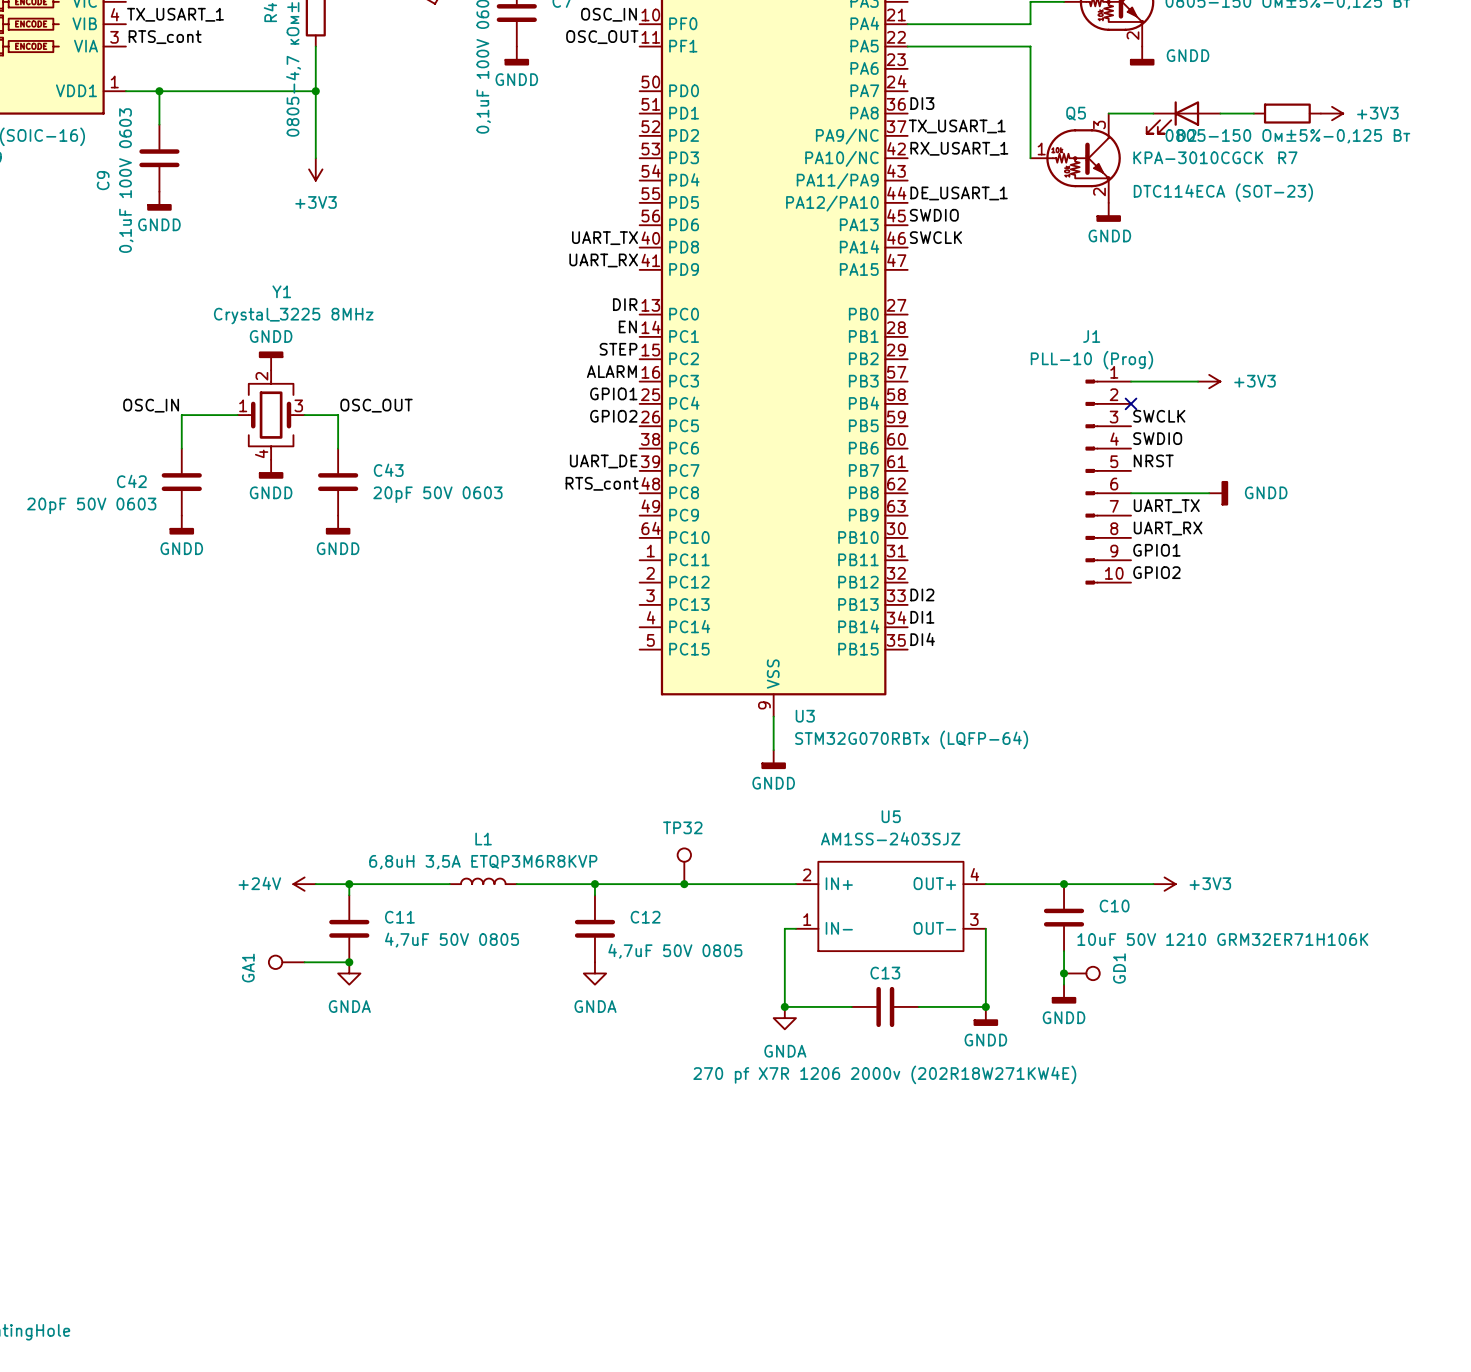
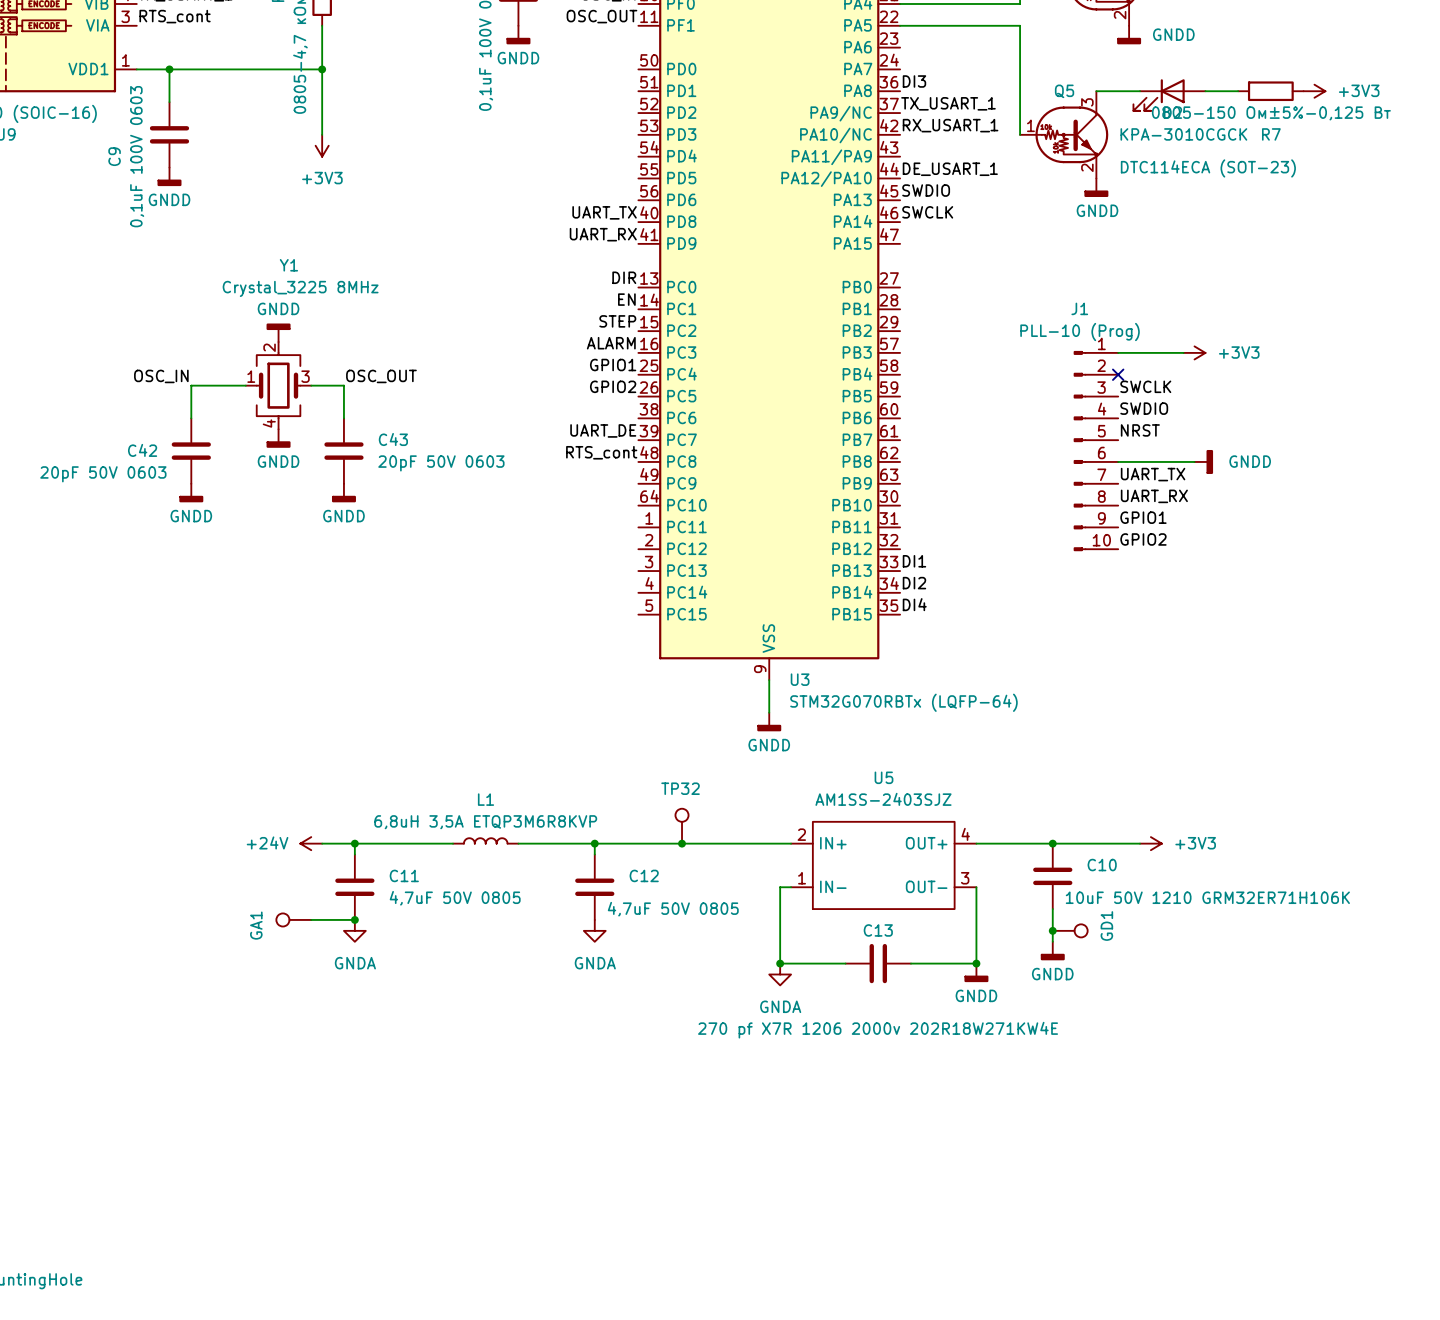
label: DI2 (922, 594) -> DI1 (914, 561)
label: DI1 (922, 617) -> DI2 (914, 583)
C13 value: 270 pf X7R 1206 2000v (202R18W271KW4E) (884, 1074) -> 270 pf X7R 1206 2000v 202R18W271KW4E (878, 1030)

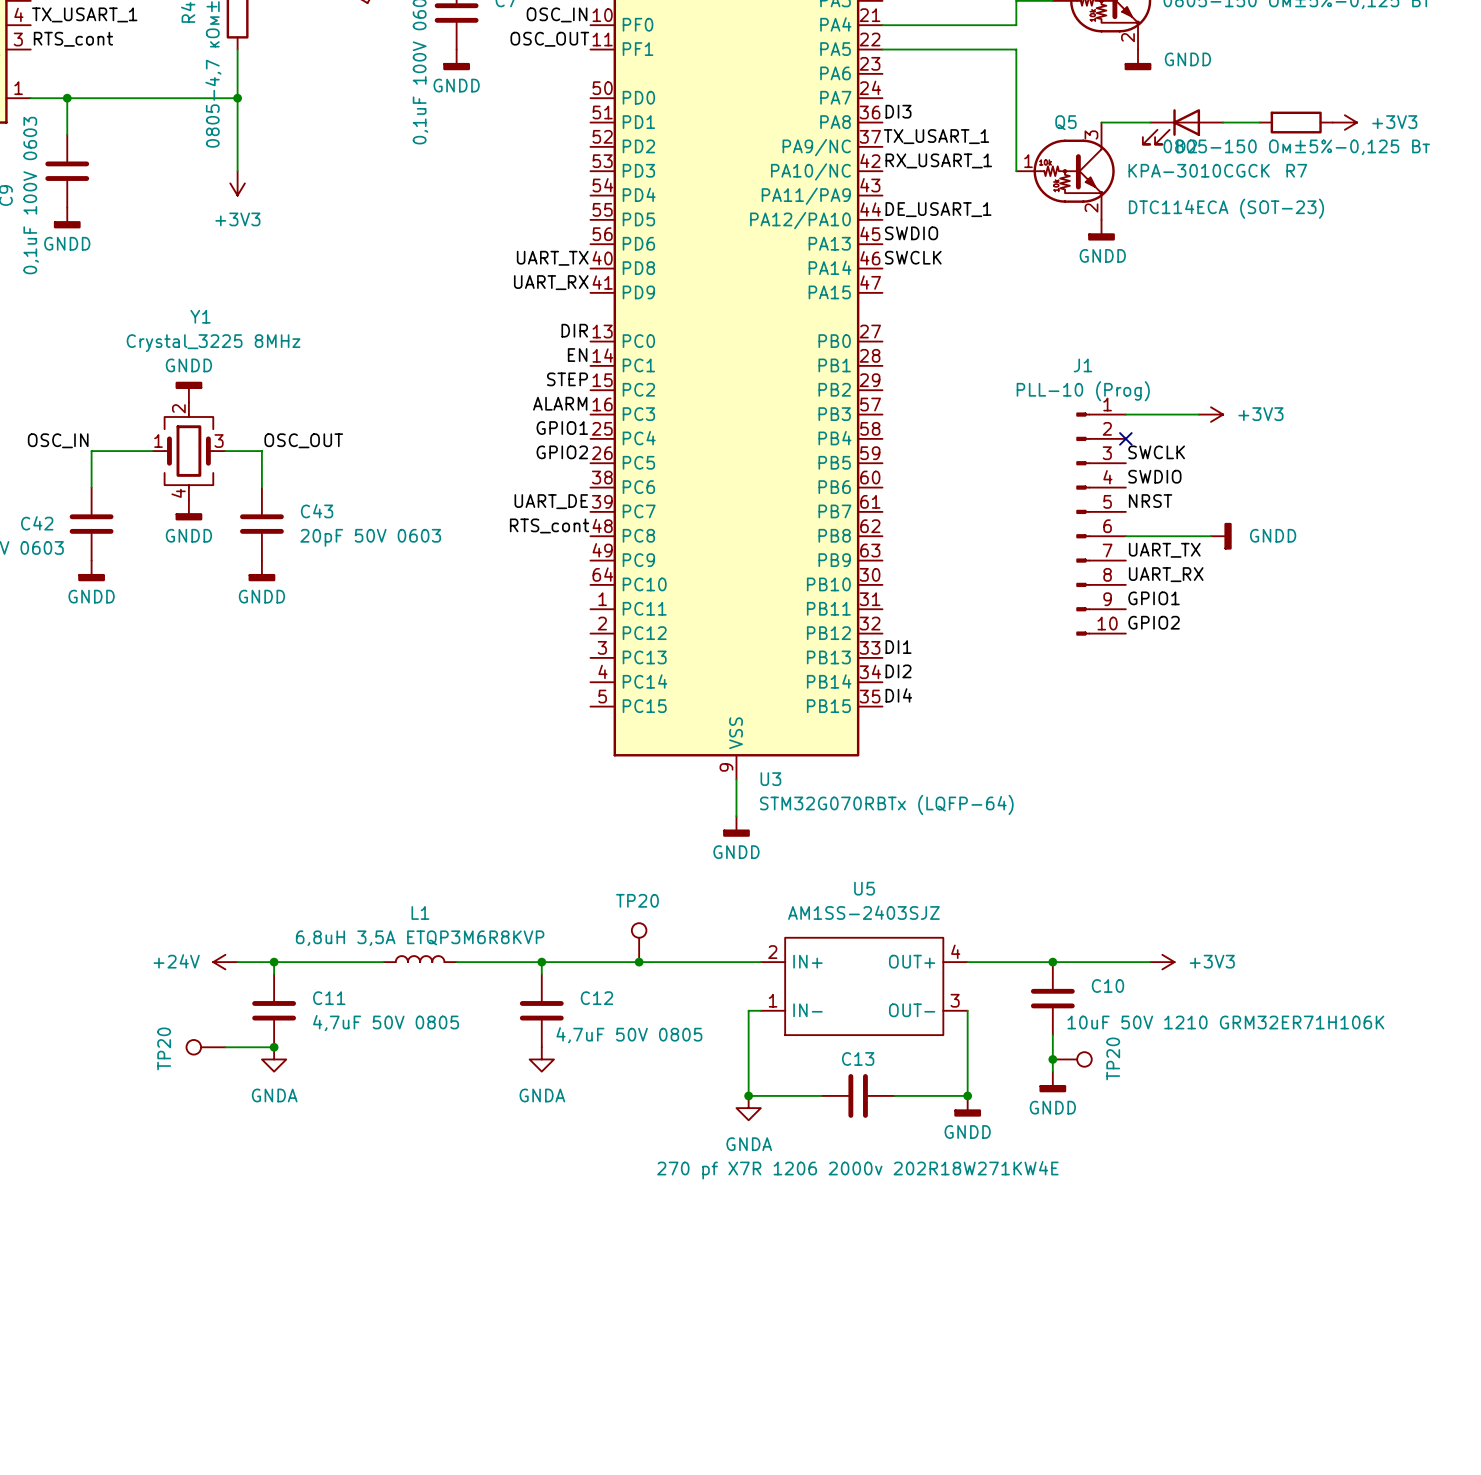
TP32 name: TP32 (680, 788) -> TP20 (637, 900)
GA1 name: GA1 (256, 925) -> TP20 (164, 1048)
GD1 name: GD1 (1106, 926) -> TP20 (1113, 1058)

